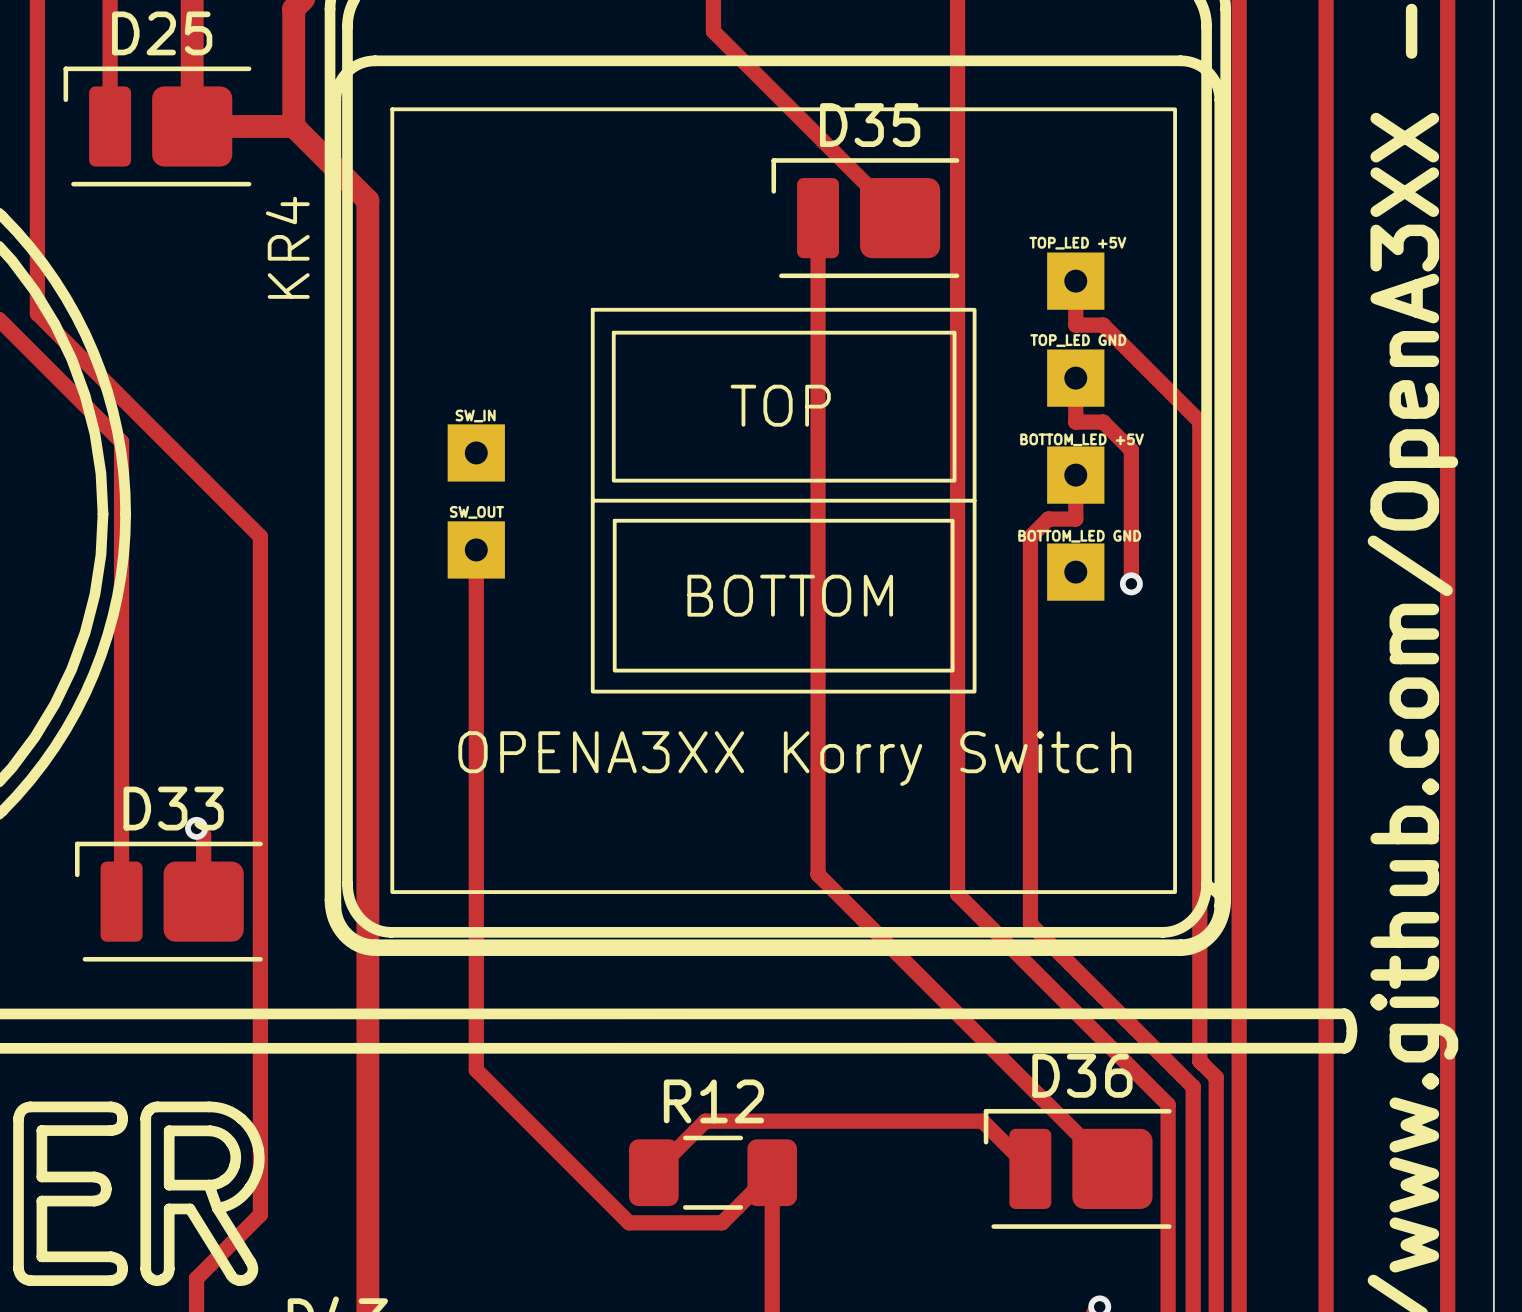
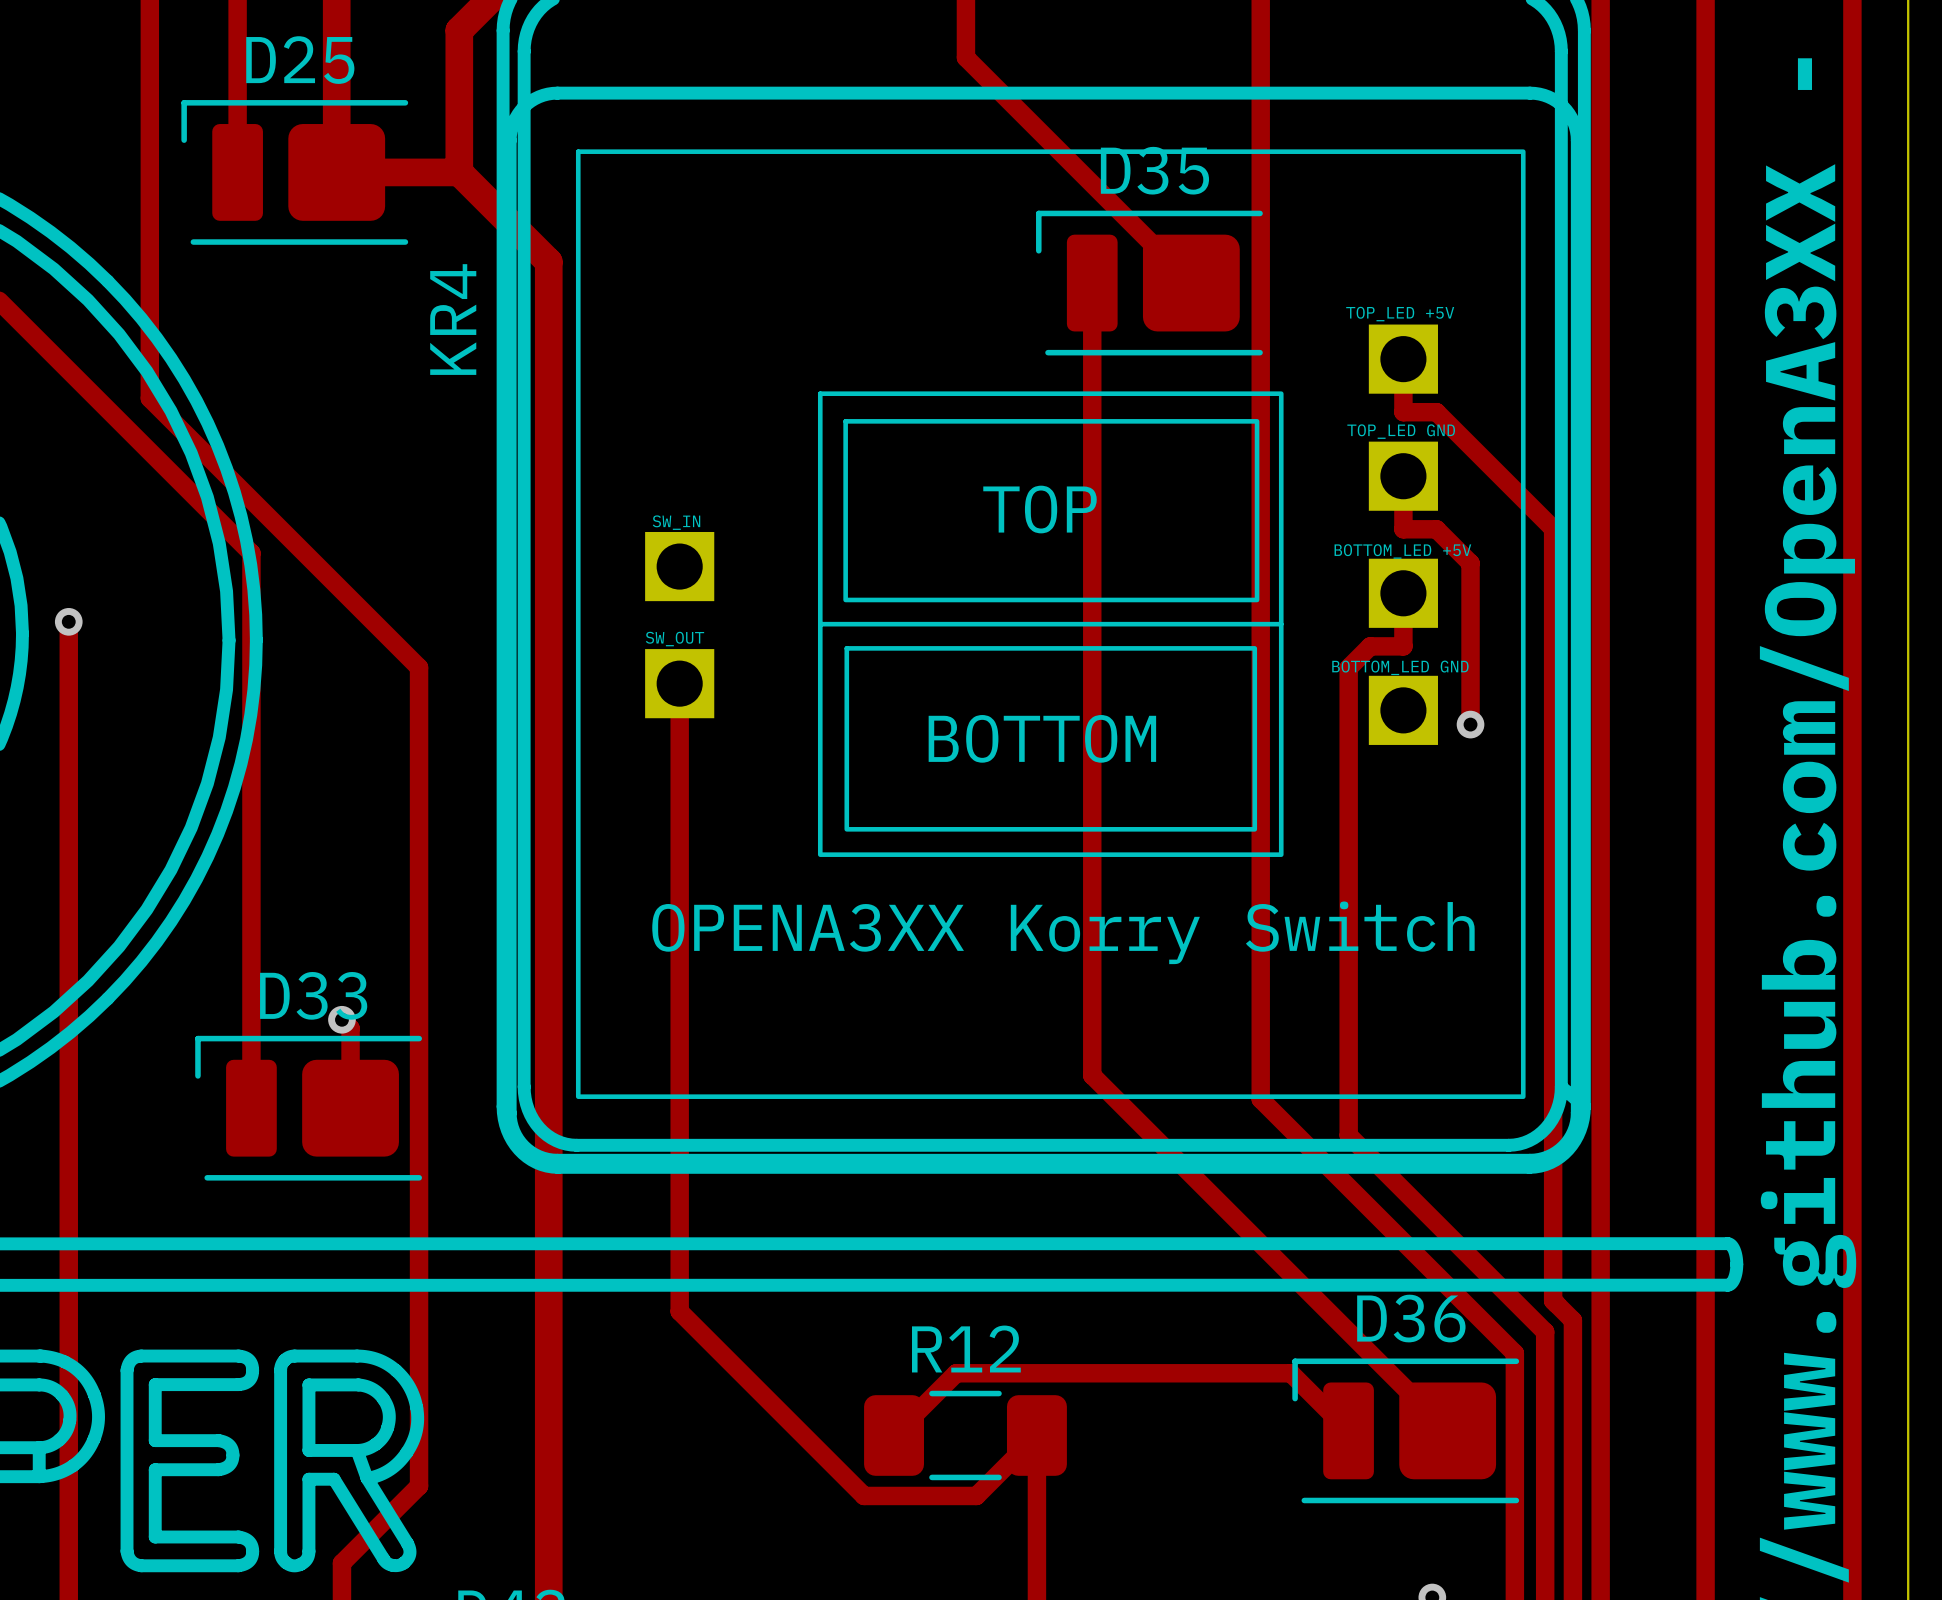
KR4 footprint: [390, 107, 1177, 894] -> [575, 149, 1526, 1099]

